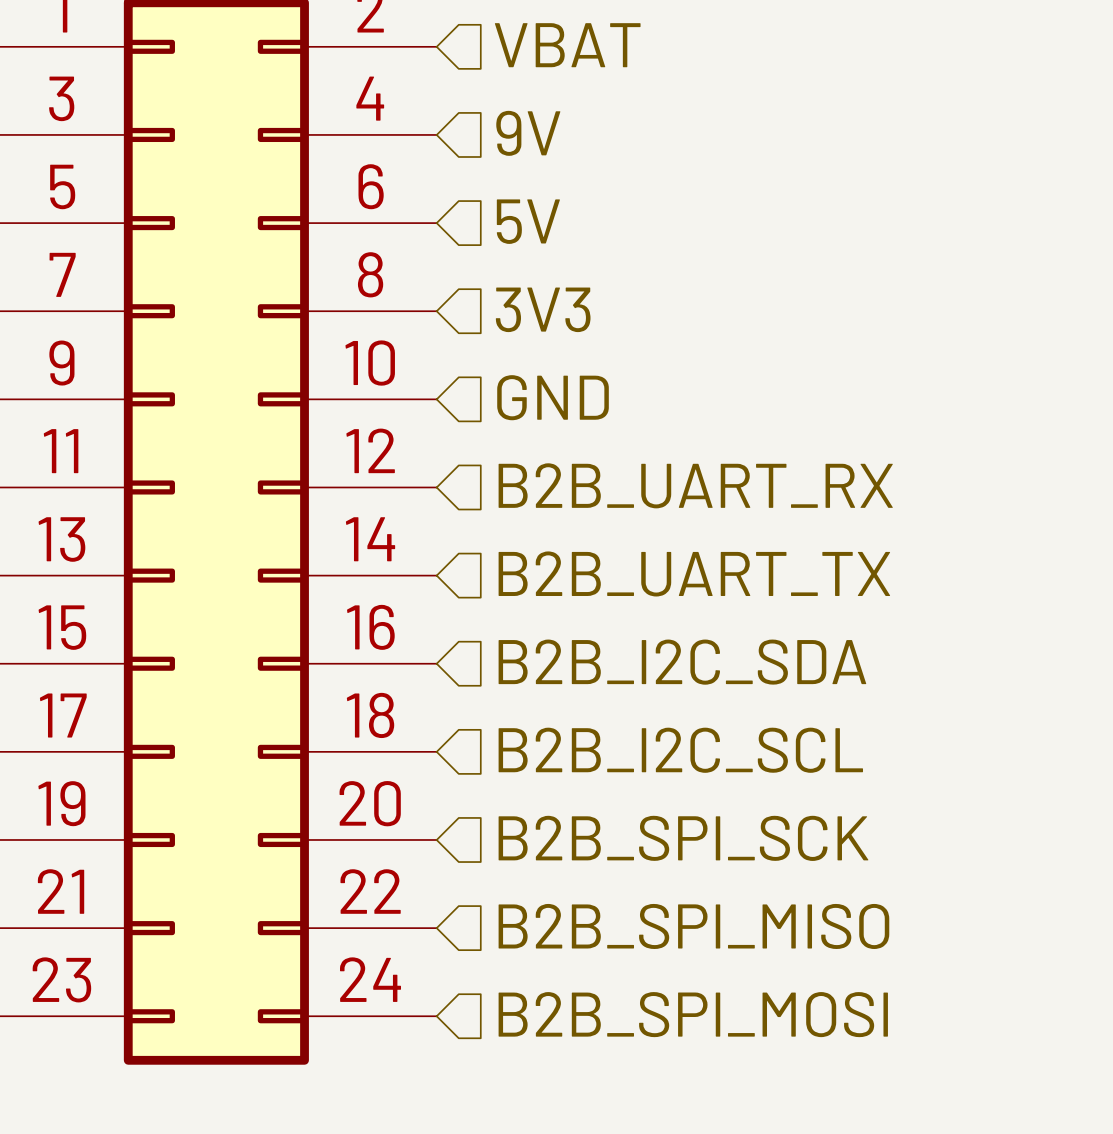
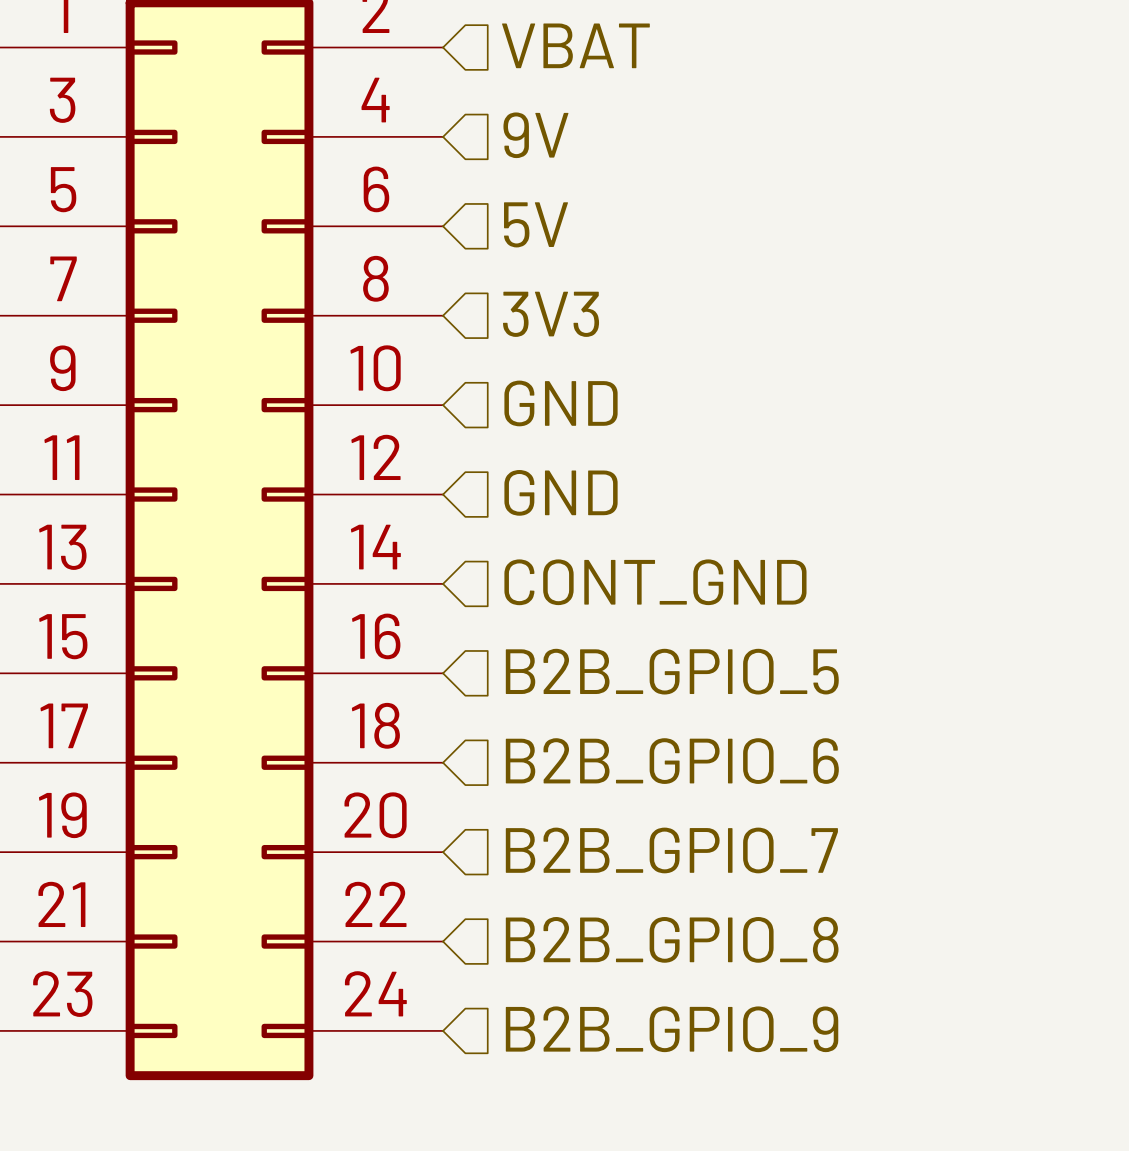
hierarchical label: B2B_UART_RX (695, 485) -> GND (561, 492)
hierarchical label: B2B_UART_TX (694, 573) -> CONT_GND (655, 582)
hierarchical label: B2B_I2C_SDA (682, 662) -> B2B_GPIO_5 (672, 671)
hierarchical label: B2B_I2C_SCL (680, 750) -> B2B_GPIO_6 (672, 761)
hierarchical label: B2B_SPI_SCK (683, 838) -> B2B_GPIO_7 (671, 850)
hierarchical label: B2B_SPI_MISO (693, 926) -> B2B_GPIO_8 (672, 939)
hierarchical label: B2B_SPI_MOSI (693, 1014) -> B2B_GPIO_9 (672, 1029)

